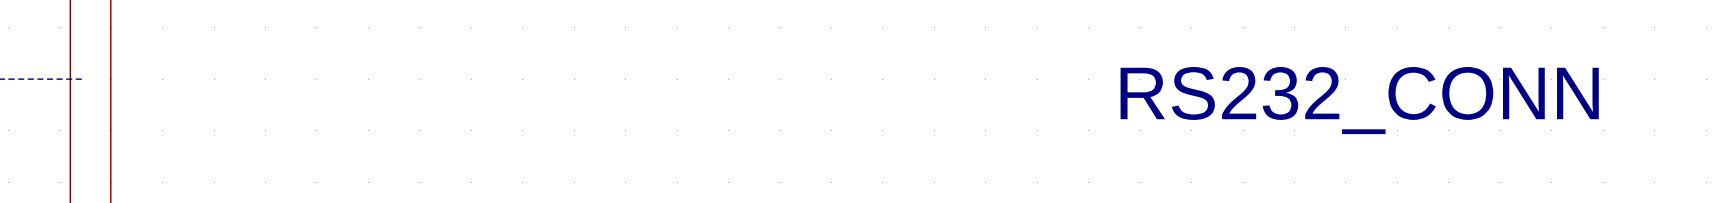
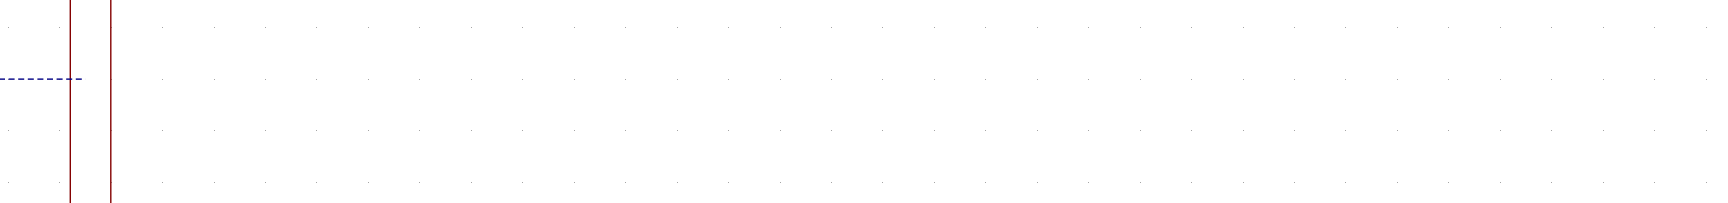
text: RS232_CONN (1359, 100) -> none

